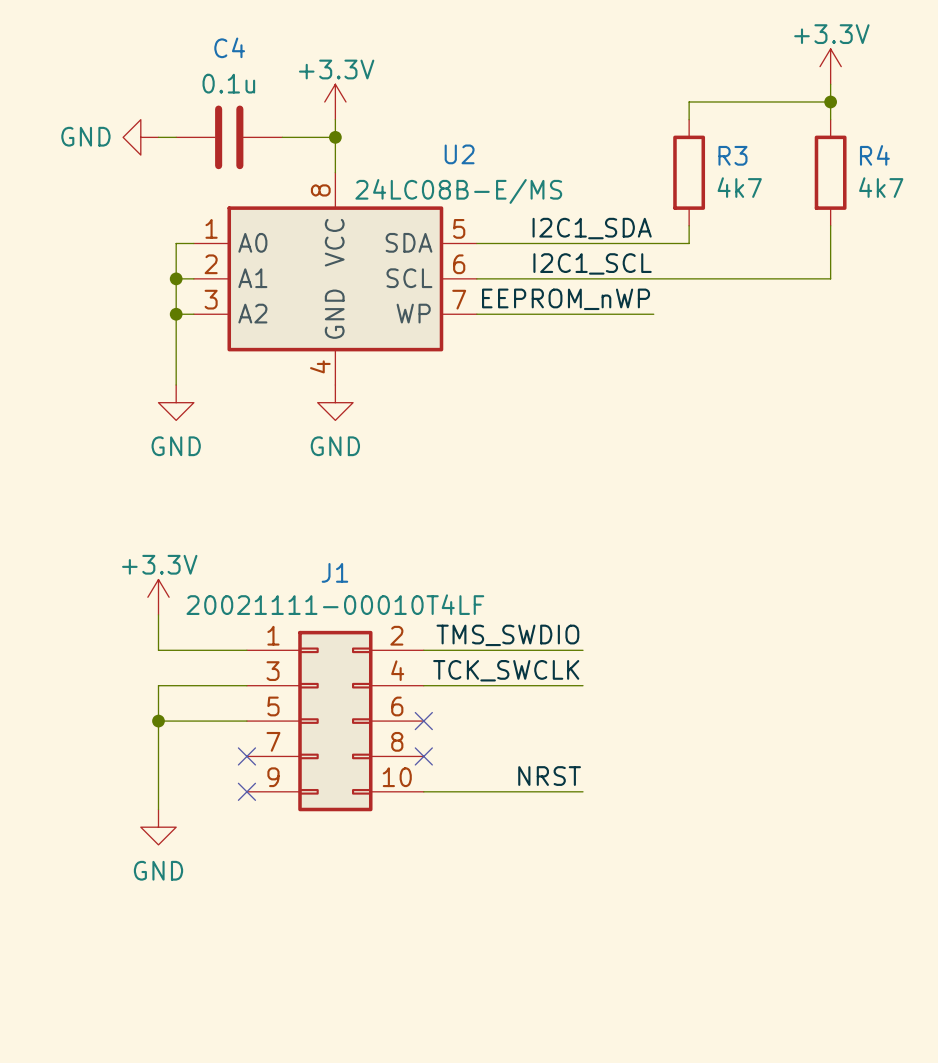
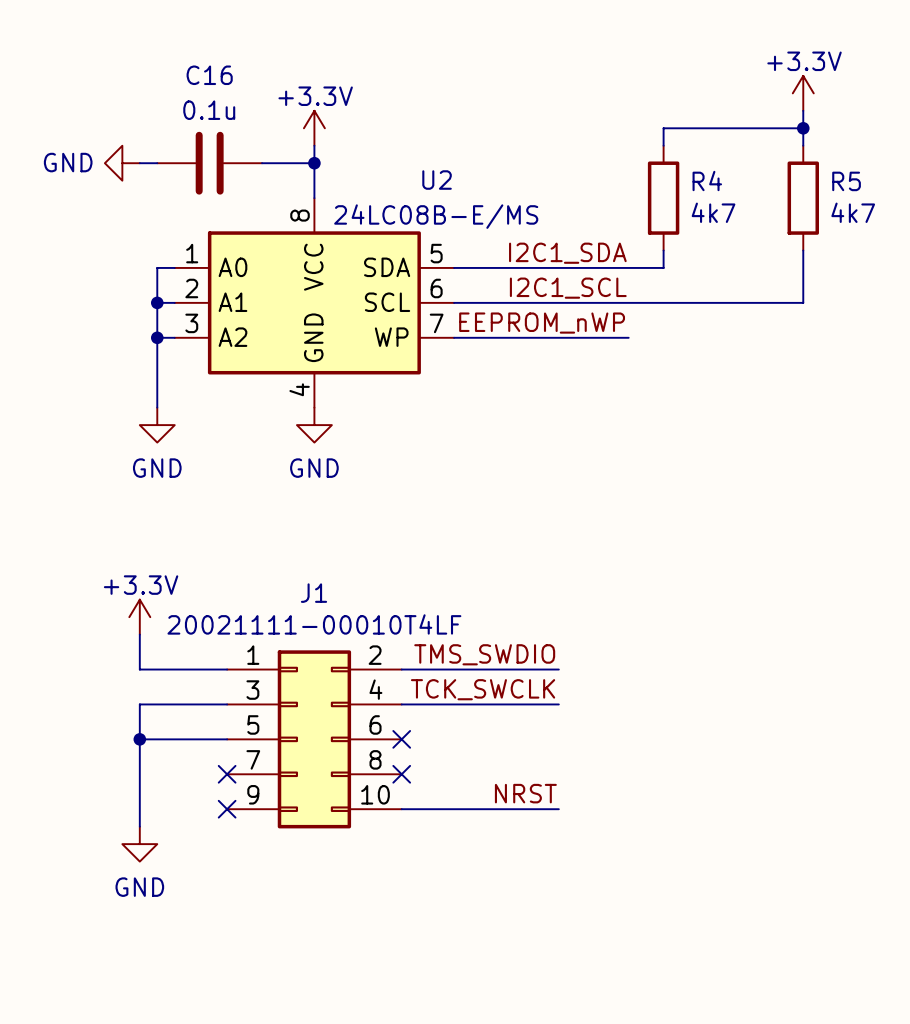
C4 name: C4 (229, 47) -> C16 (209, 75)
R3 name: R3 (732, 155) -> R4 (707, 181)
R4 name: R4 (874, 155) -> R5 (846, 181)

